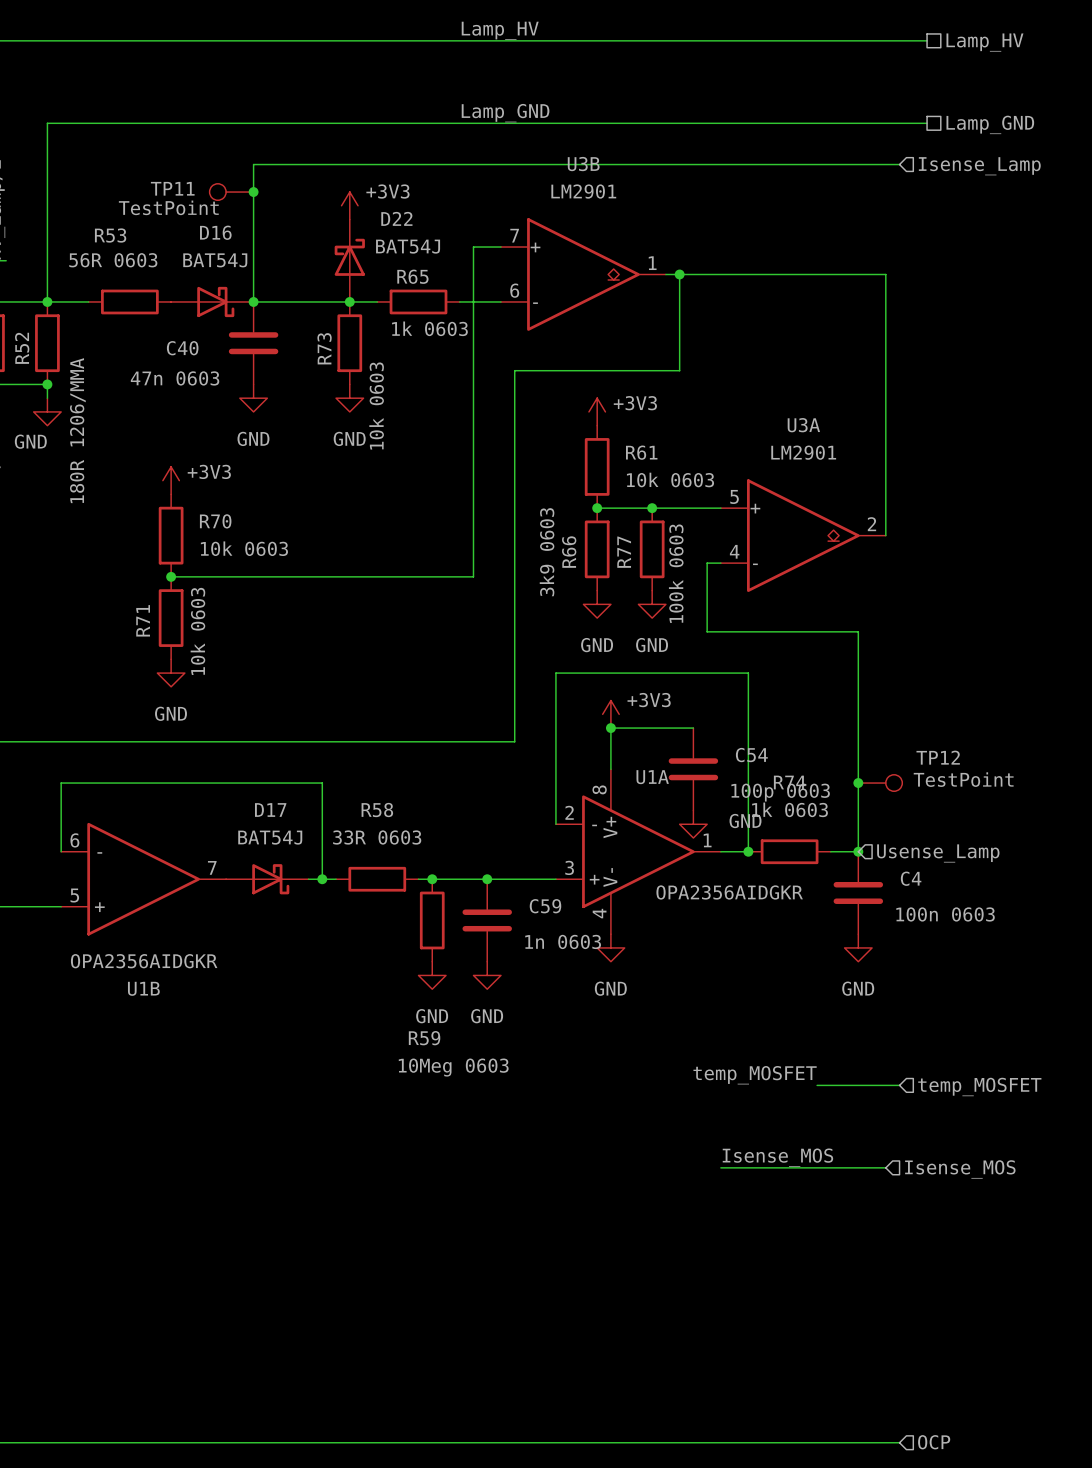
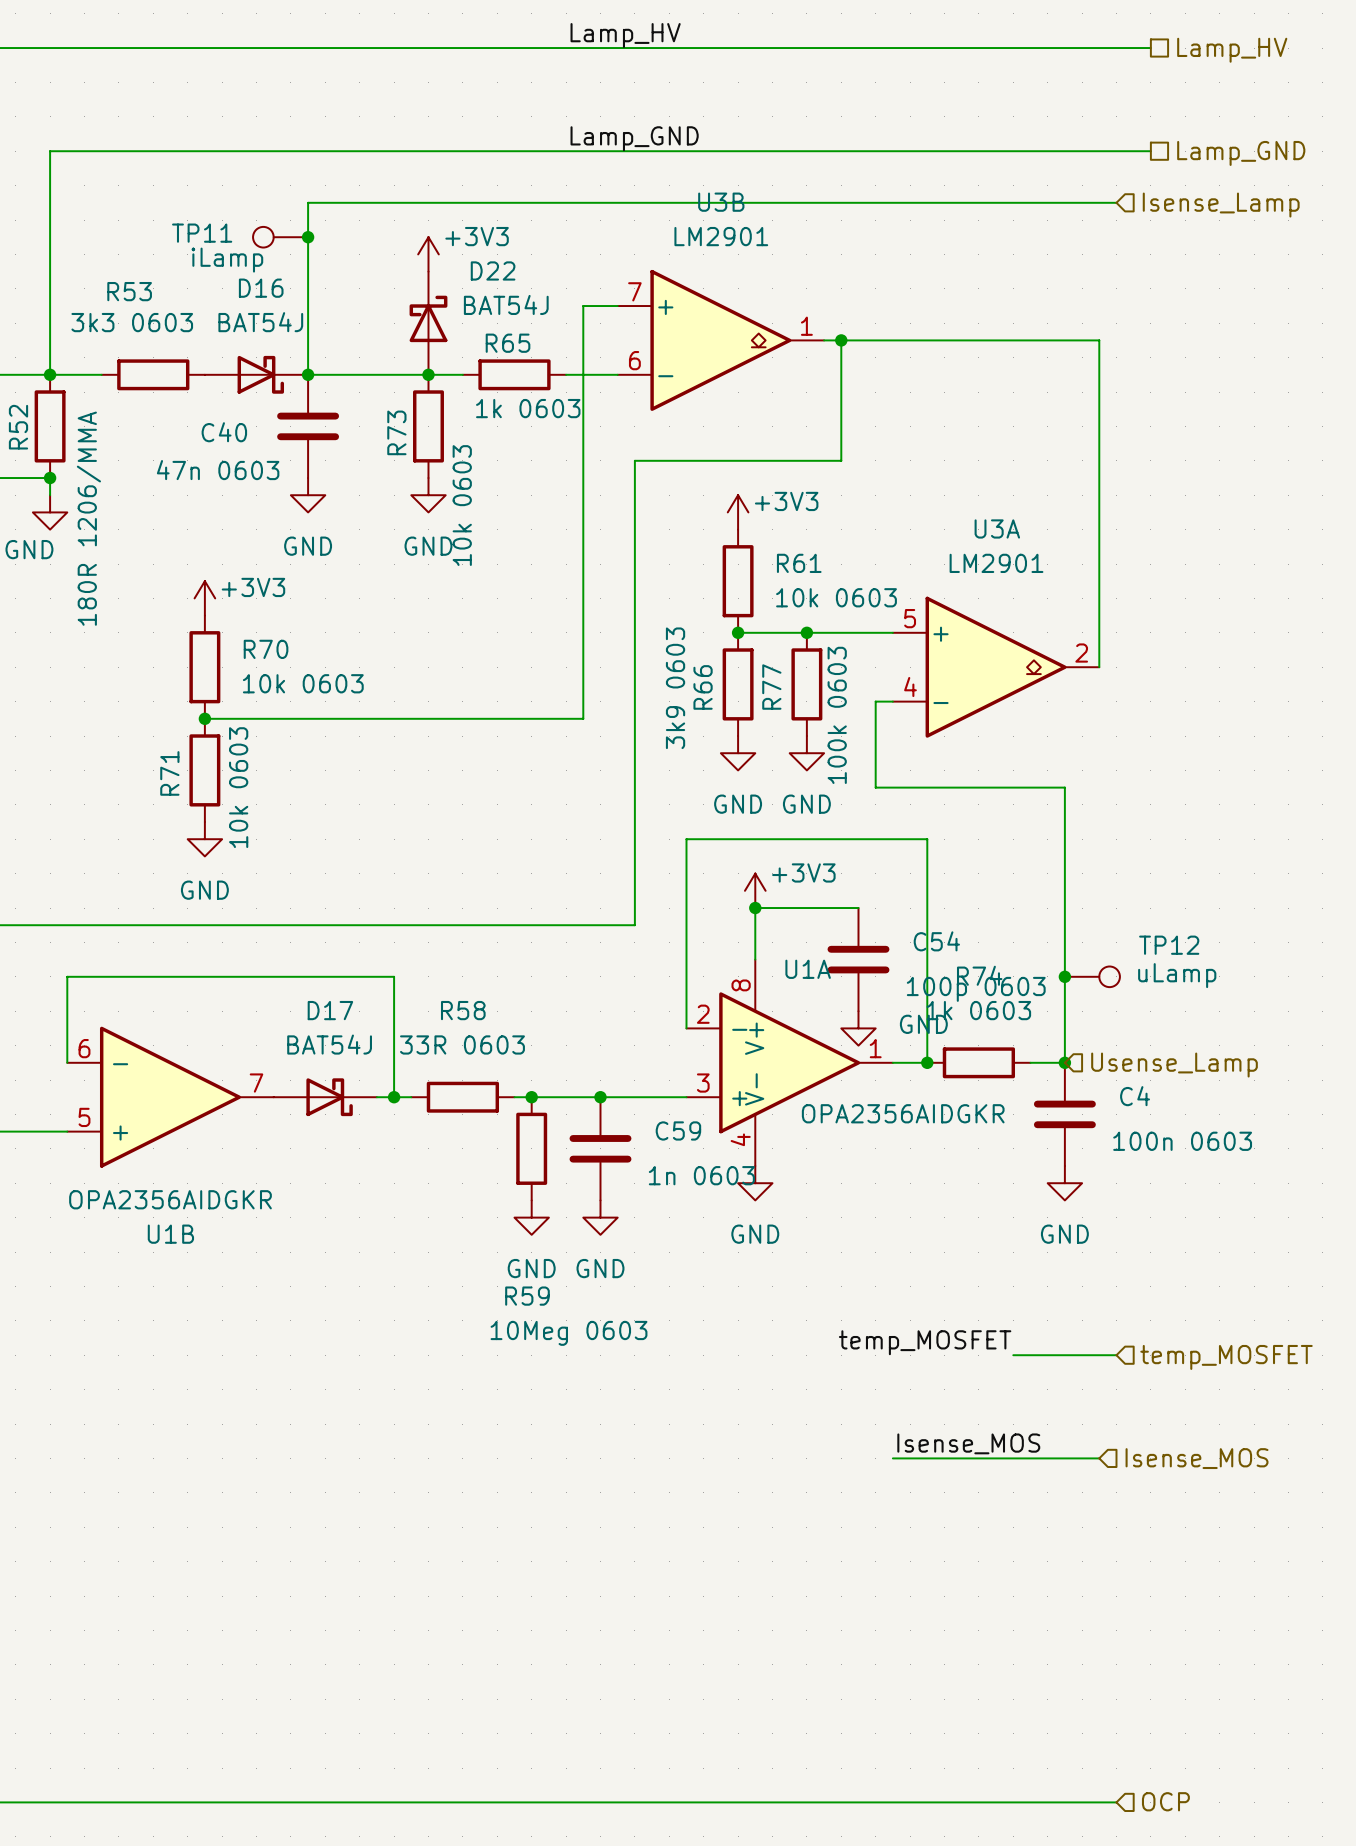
TP11 value: TestPoint (168, 207) -> iLamp (227, 260)
R53 value: 56R 0603 (113, 260) -> 3k3 0603 (132, 322)
TP12 value: TestPoint (963, 779) -> uLamp (1177, 975)

